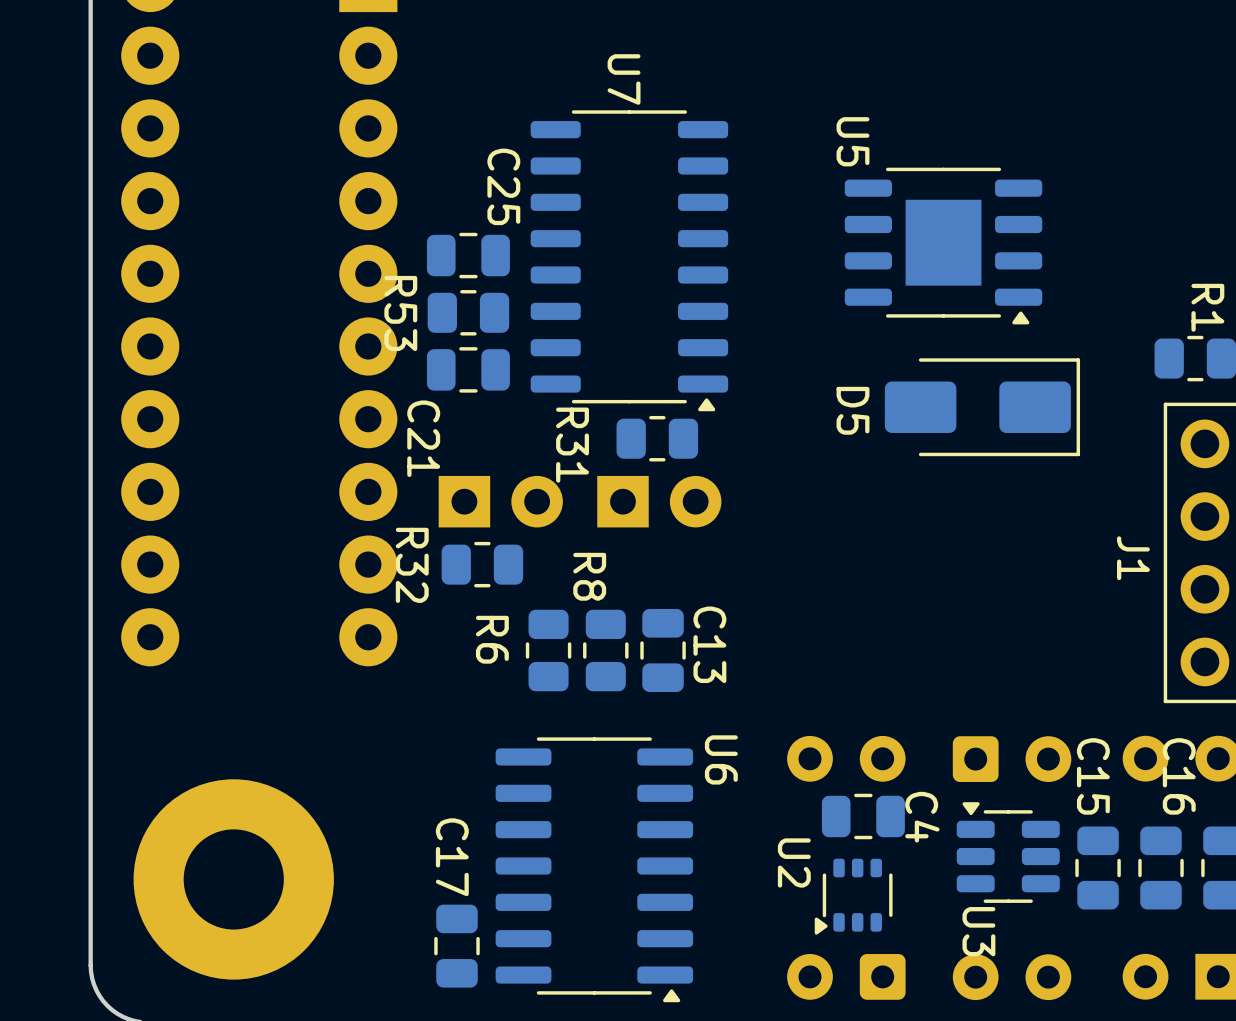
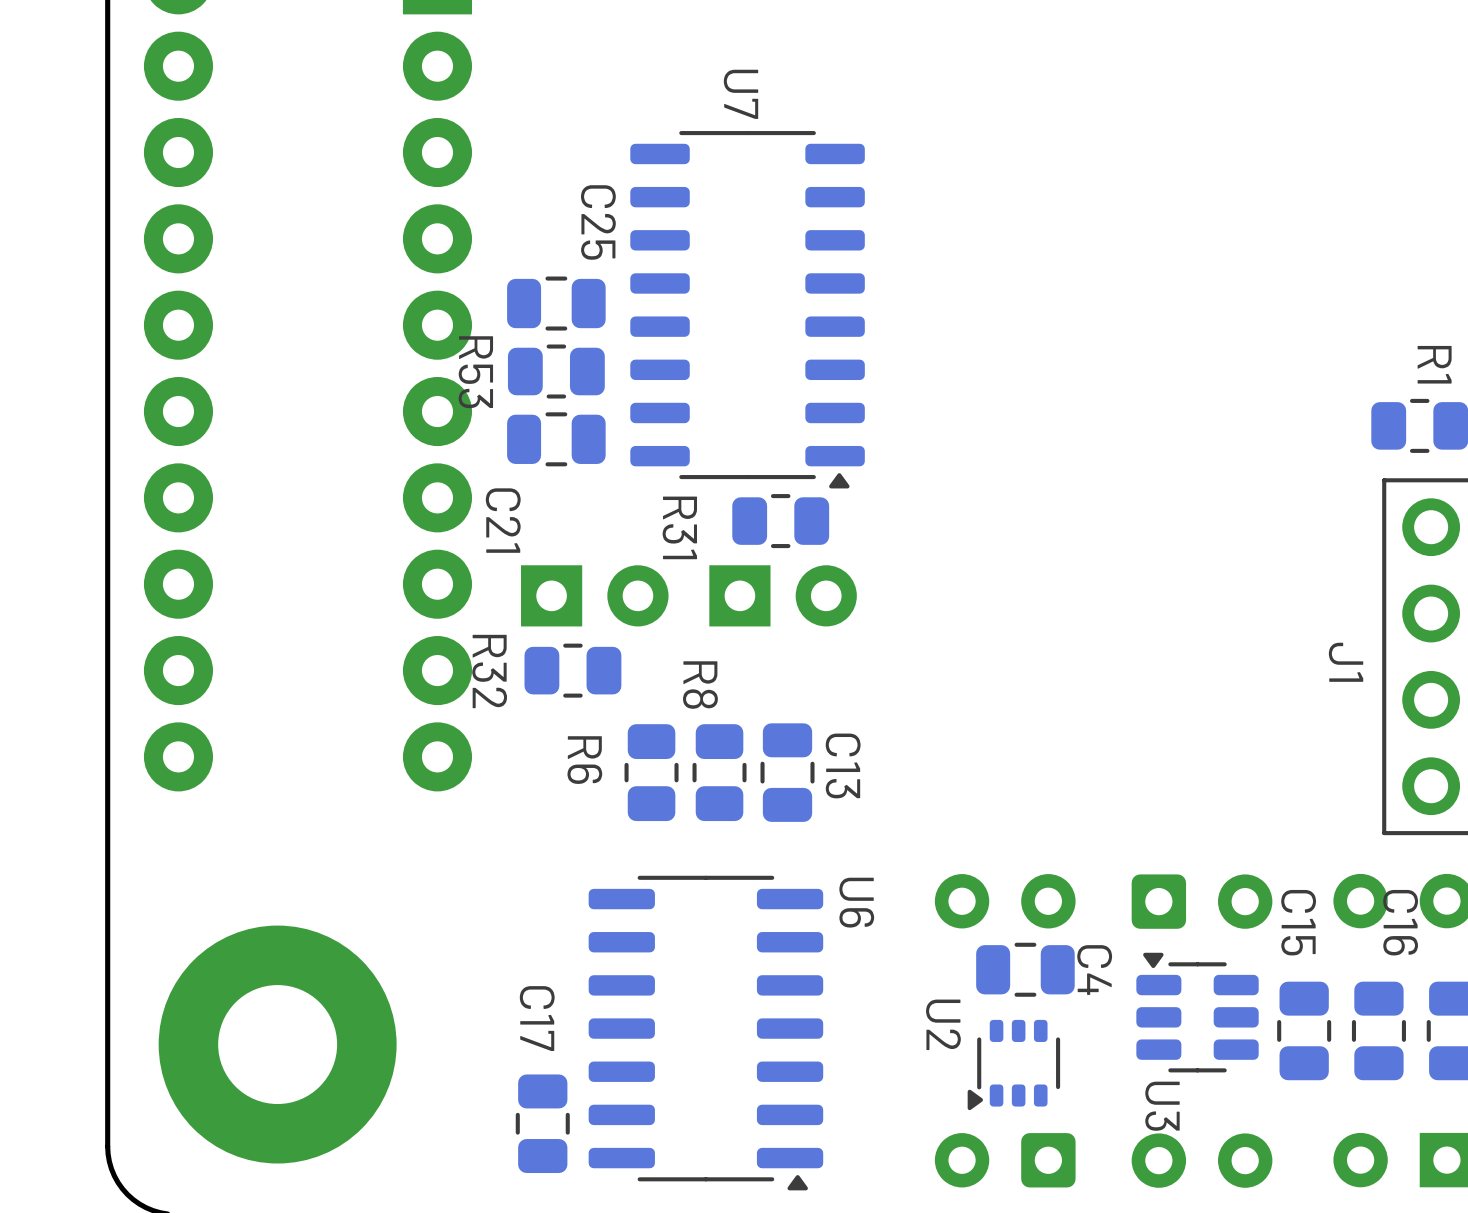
U5: (943, 246) -> none
D5: (982, 407) -> none

